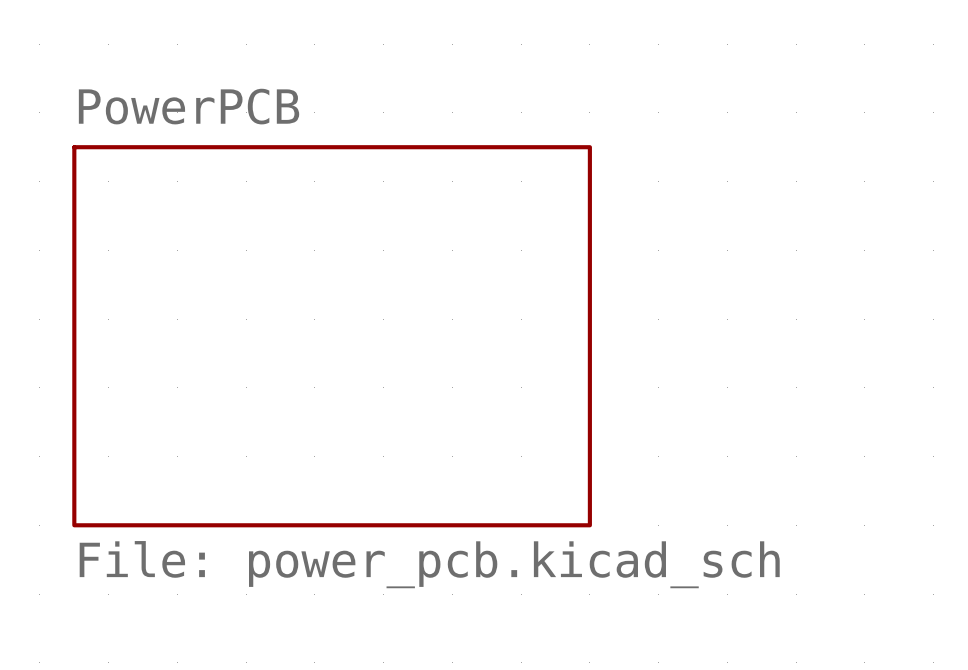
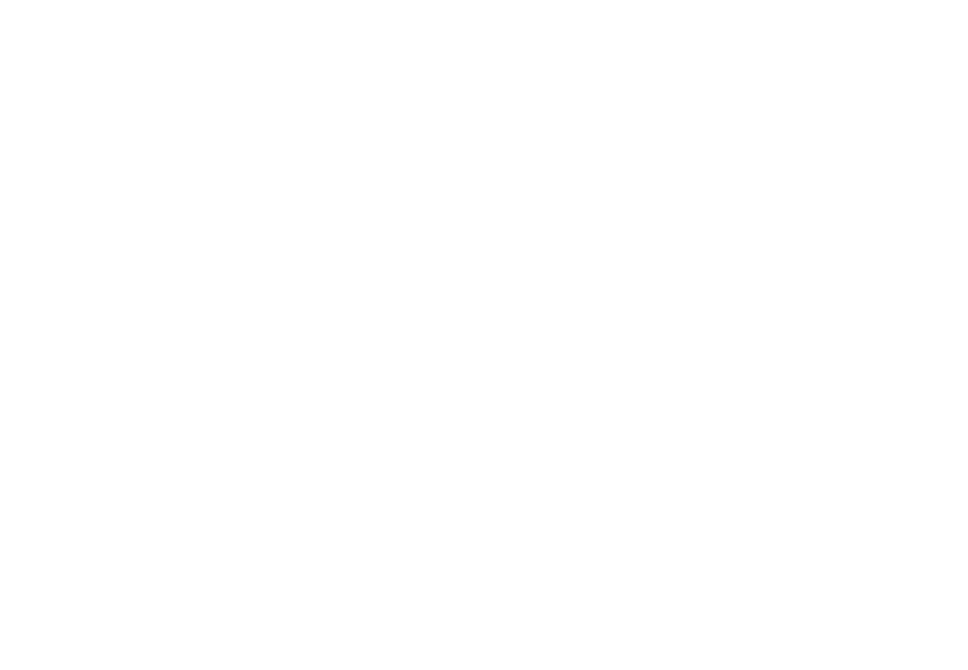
sheet PowerPCB: File: power_pcb.kicad_sch (332, 336) -> none

